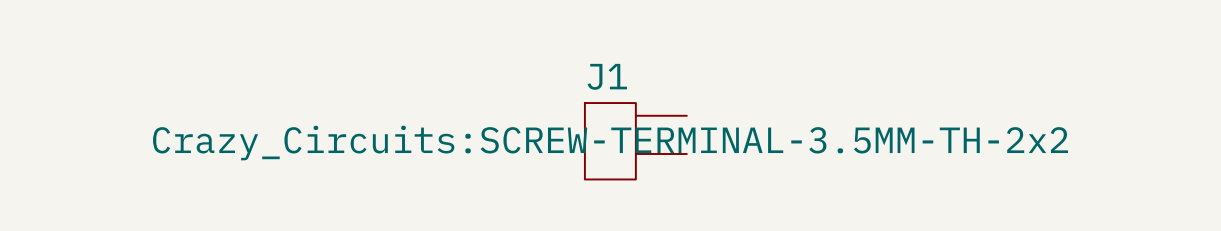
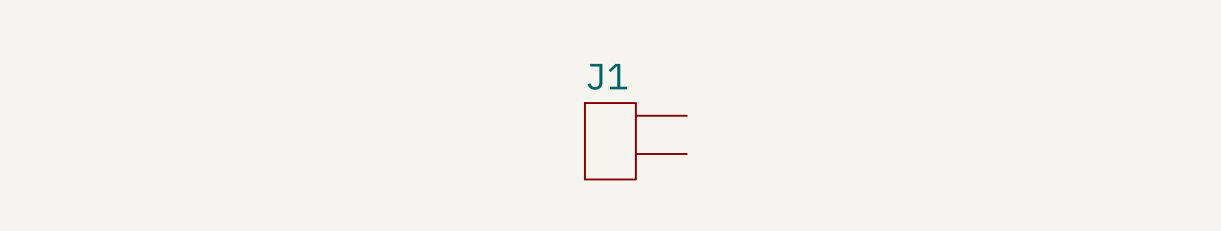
J1 text: Crazy_Circuits:SCREW-TERMINAL-3.5MM-TH-2x2 (610, 143) -> none

